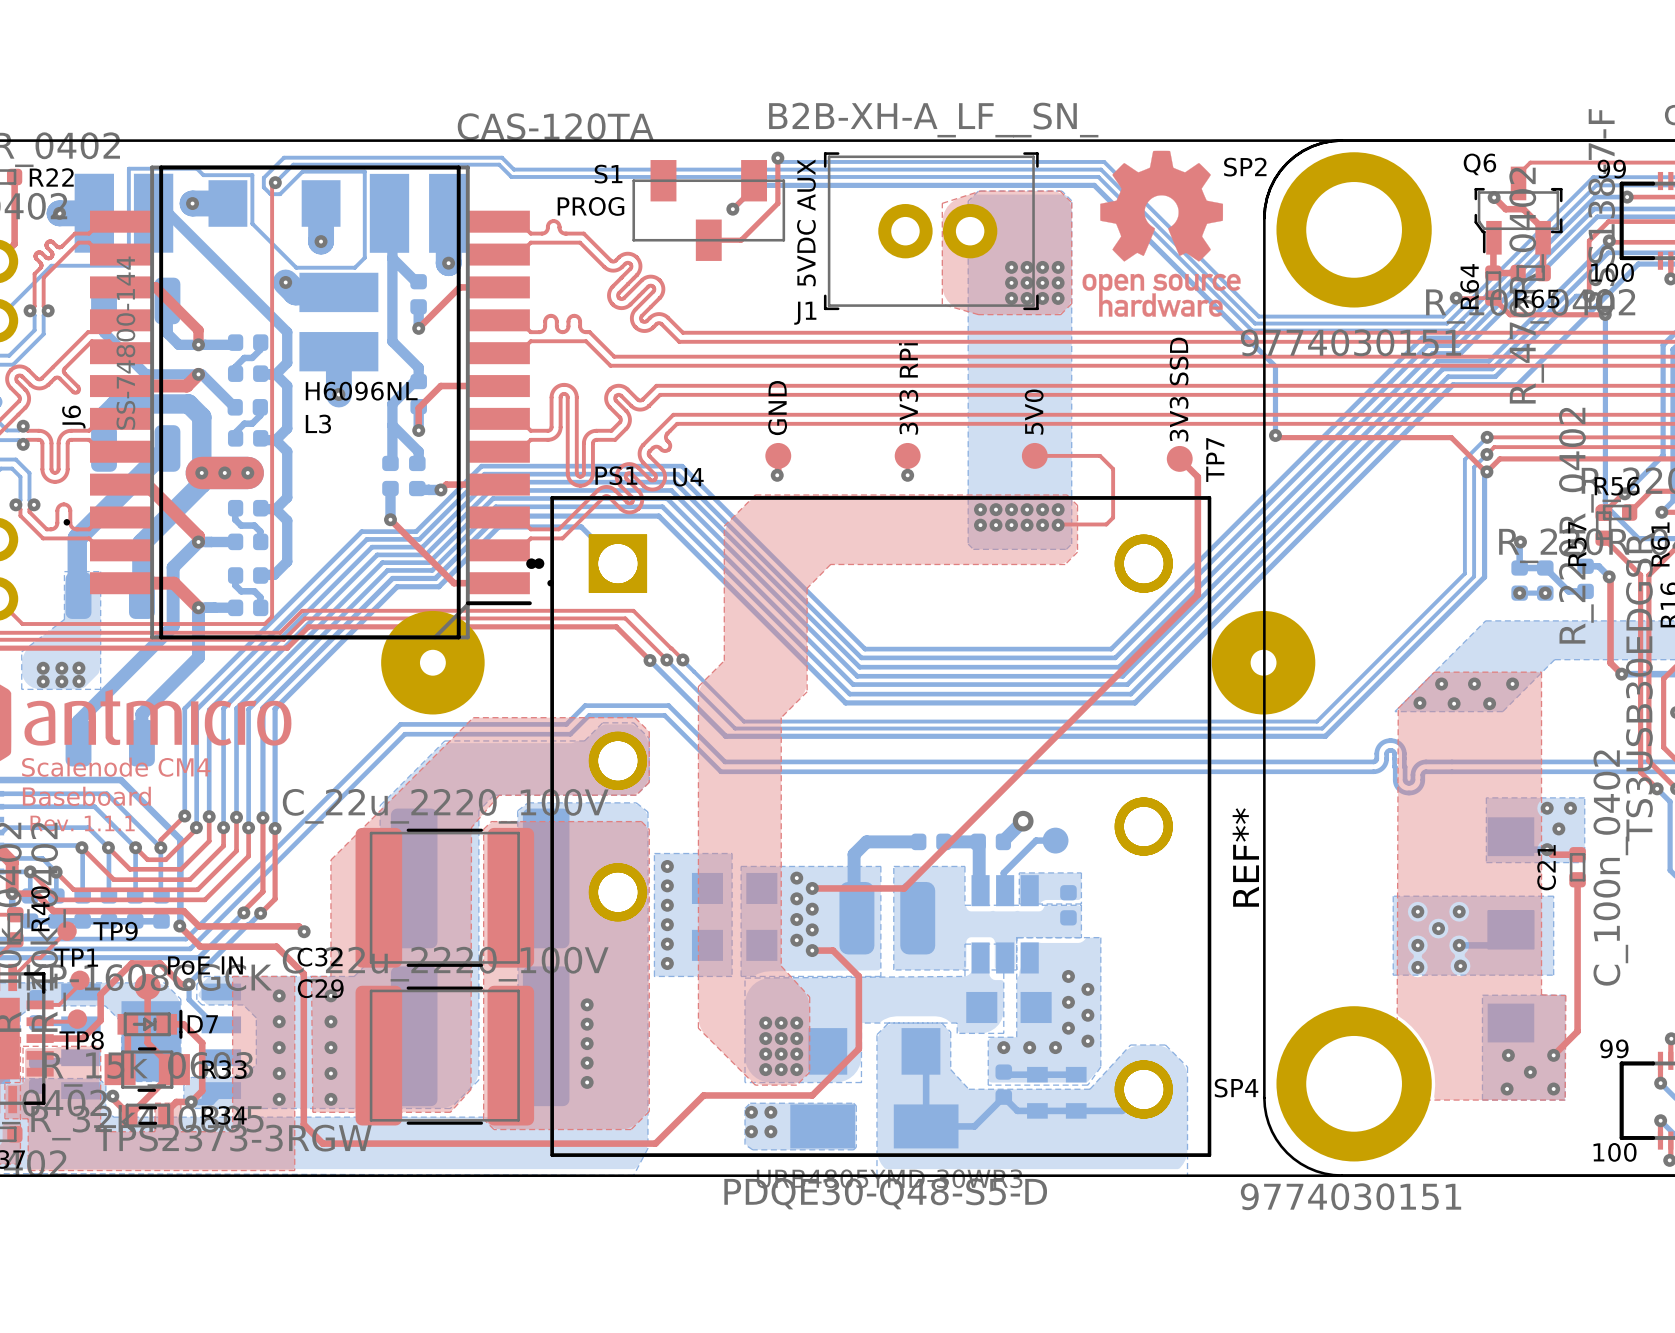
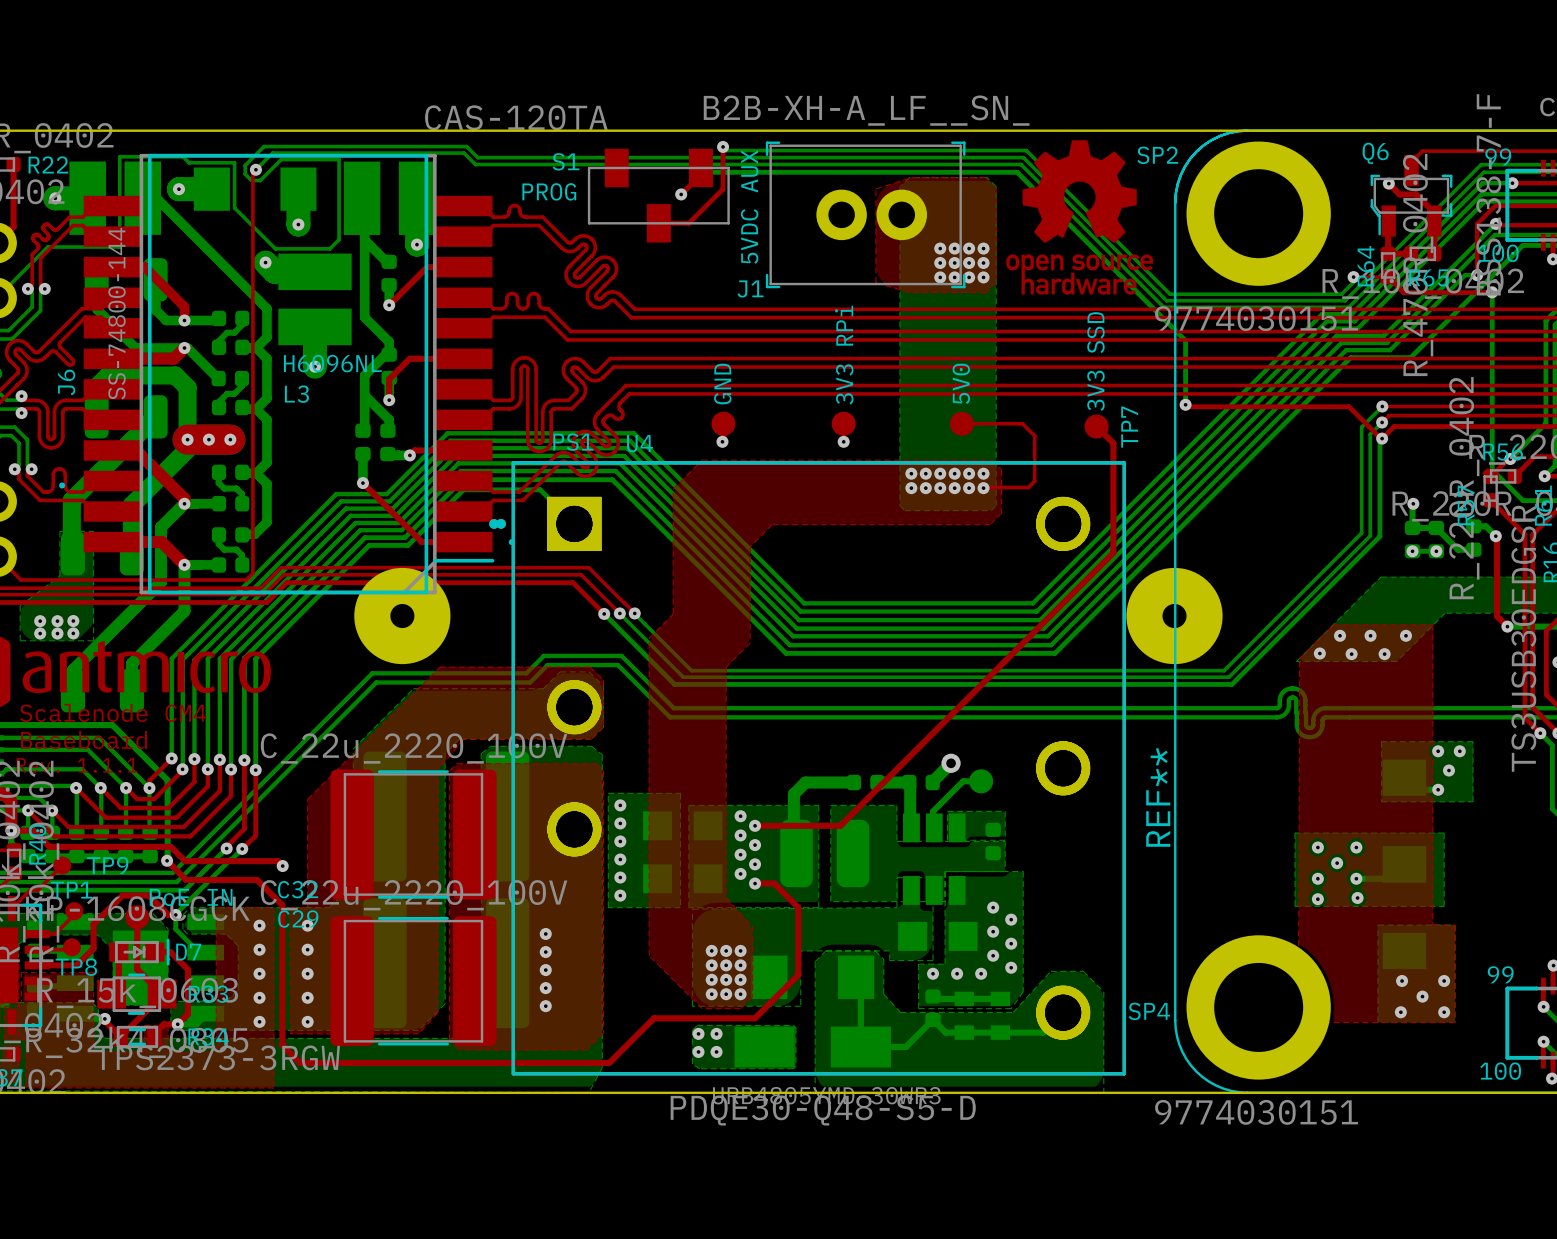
top track: (1547, 849) (1552, 854) (1577, 854) -> none
C21: C_100n_0402 (1577, 867) -> none
top track: (1577, 879) (1577, 1031) (1553, 1055) -> none

